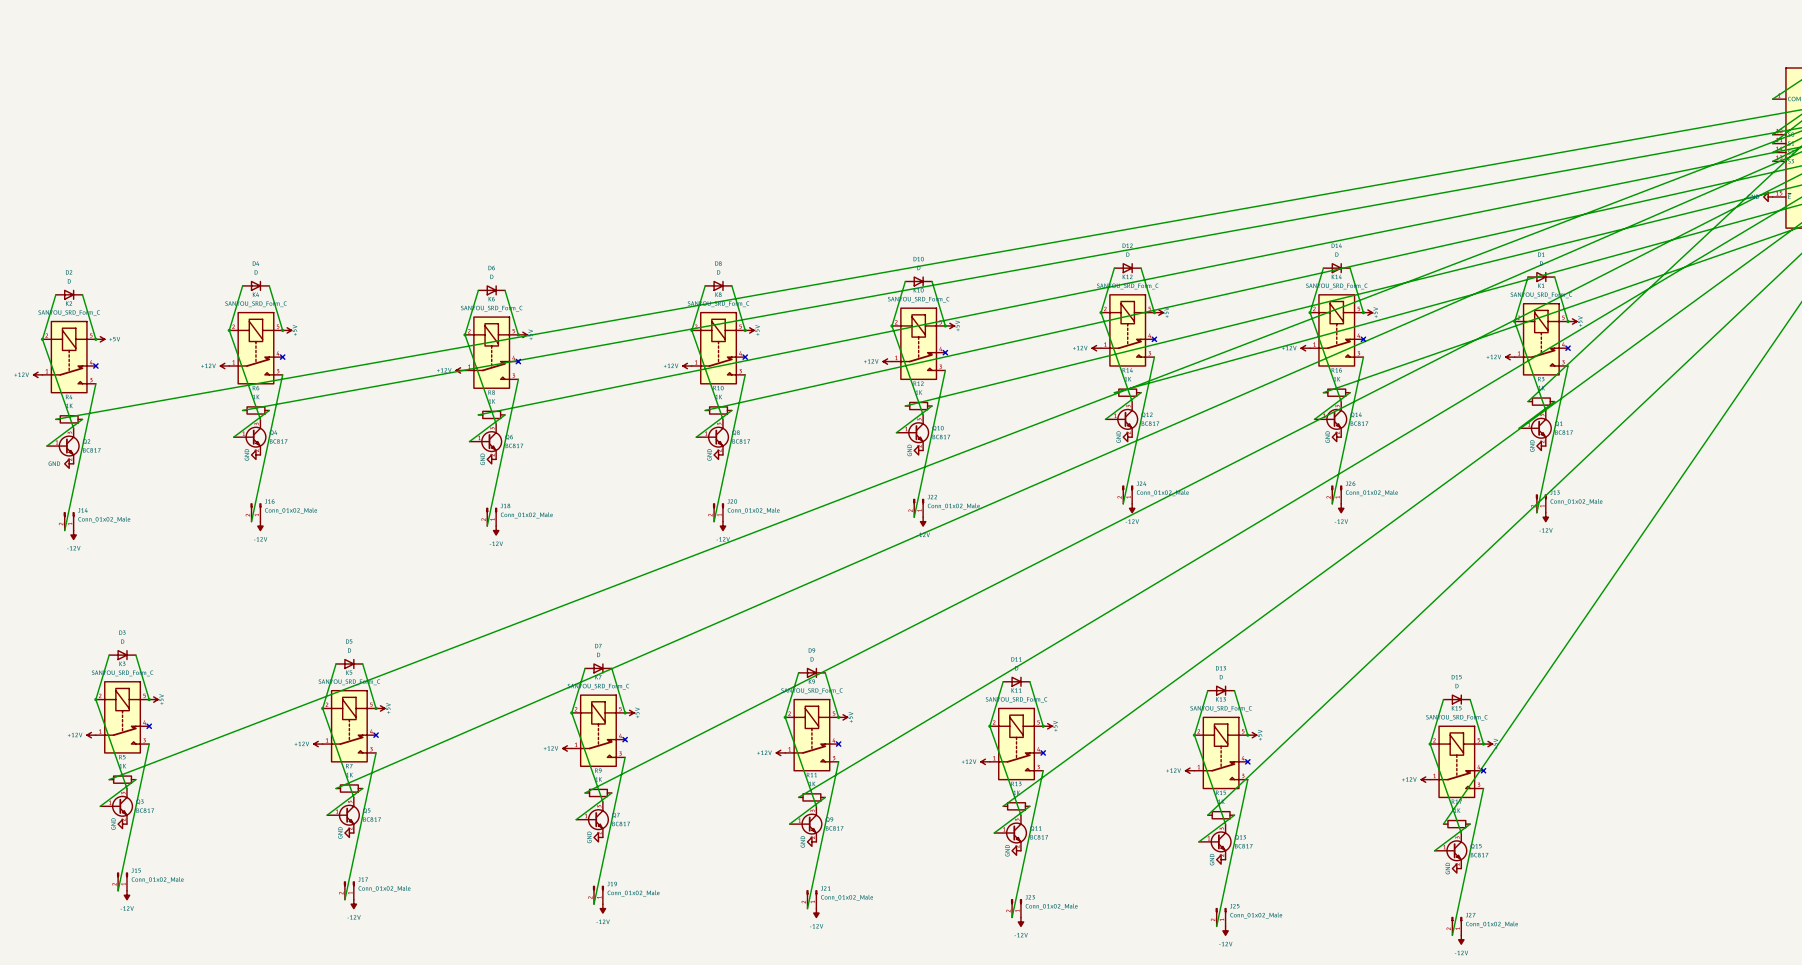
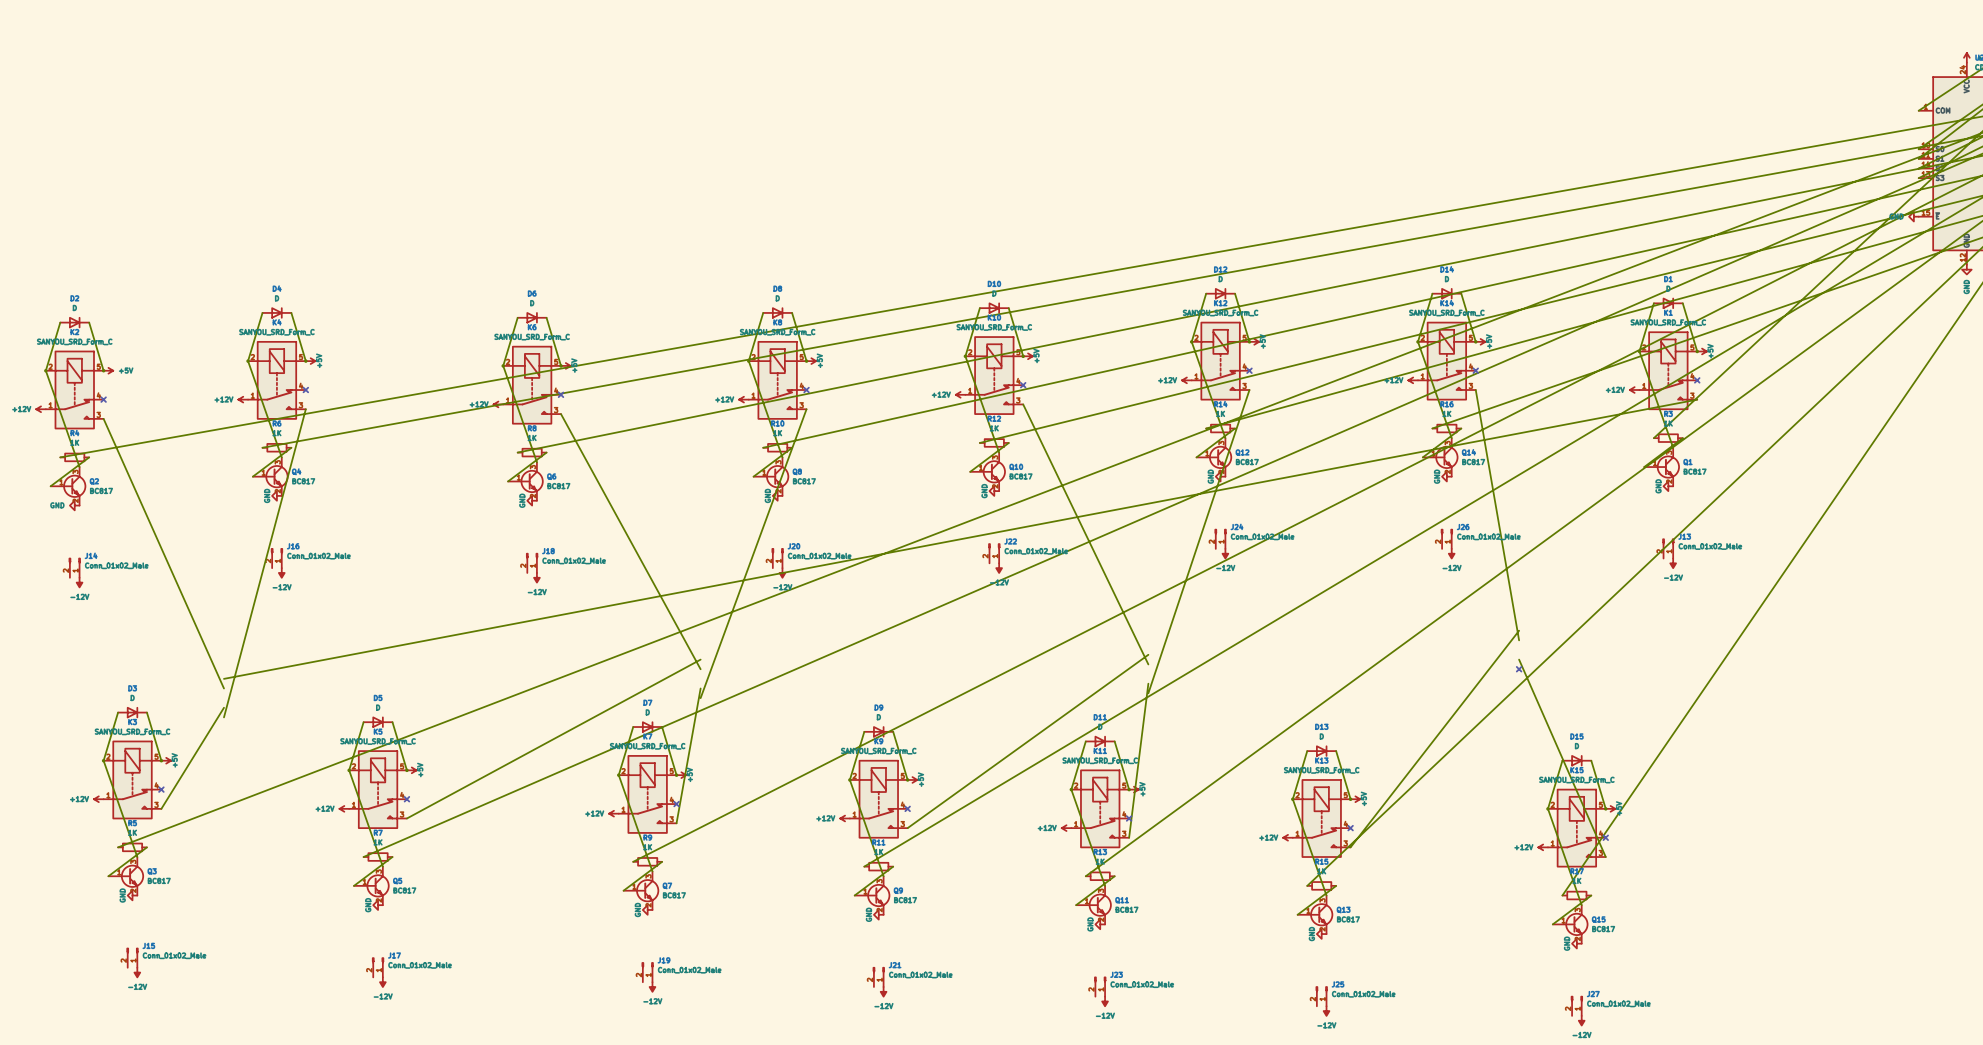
wire: (1154, 357) (1123, 503) -> (1249, 390) (1148, 693)
wire: (1363, 357) (1332, 503) -> (1475, 390) (1519, 640)
wire: (1568, 366) (1536, 512) -> (1697, 399) (223, 678)
wire: (945, 370) (914, 517) -> (1023, 404) (1148, 664)
wire: (282, 374) (251, 521) -> (305, 409) (223, 717)
wire: (745, 374) (714, 521) -> (806, 409) (700, 698)
wire: (518, 379) (487, 526) -> (561, 414) (700, 669)
wire: (95, 383) (64, 530) -> (103, 418) (223, 688)
no-connect mark: none -> (1519, 669)
wire: (149, 744) (118, 890) -> (161, 808) (223, 707)
wire: (376, 752) (344, 899) -> (406, 818) (700, 659)
wire: (625, 757) (593, 904) -> (676, 823) (700, 688)
wire: (838, 761) (807, 908) -> (907, 828) (1148, 654)
wire: (1043, 770) (1012, 917) -> (1129, 837) (1148, 683)
wire: (1247, 779) (1216, 926) -> (1350, 847) (1519, 630)
wire: (1483, 788) (1452, 935) -> (1605, 857) (1519, 659)

